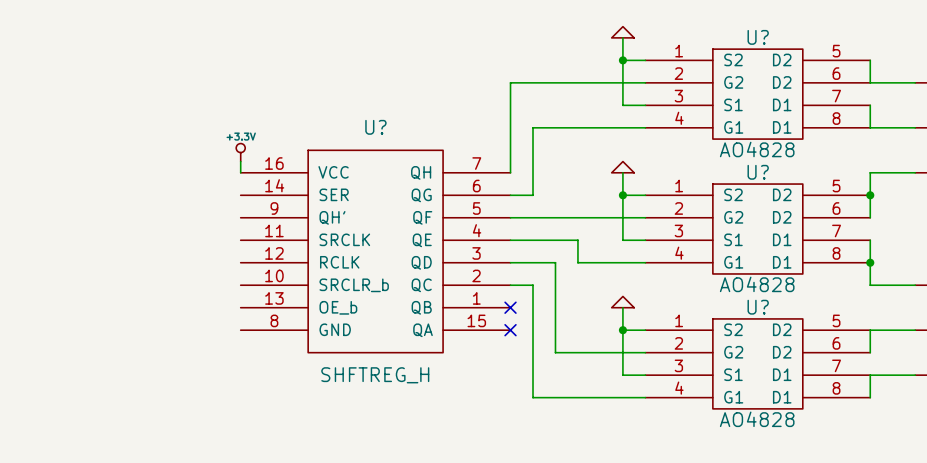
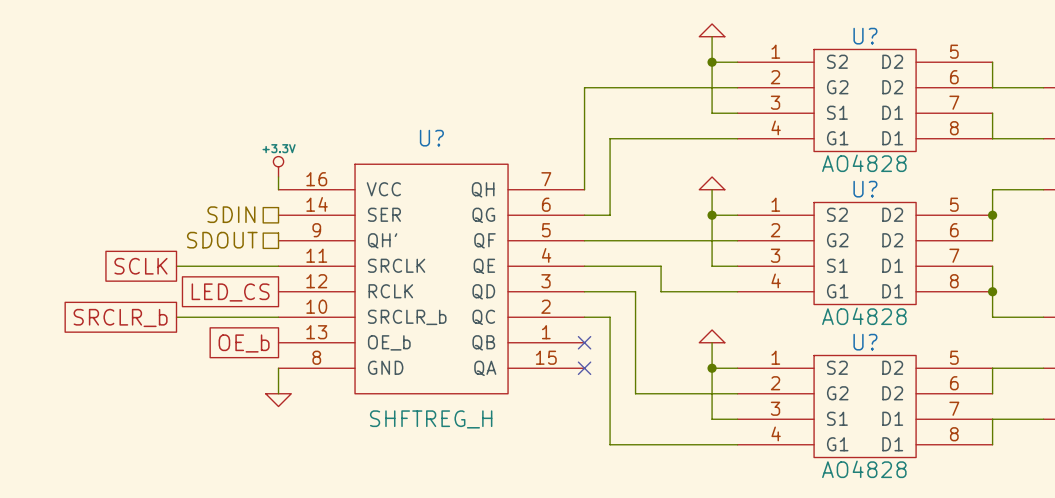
hierarchical label: none -> SDIN (231, 214)
hierarchical label: none -> SDOUT (222, 240)
global label: none -> SCLK (140, 266)
wire: none -> (176, 266) (278, 266)
global label: none -> LED_CS (230, 292)
global label: none -> SRCLR_b (120, 317)
wire: none -> (176, 317) (278, 317)
global label: none -> OE_b (244, 343)
wire: none -> (278, 368) (278, 393)
power symbol: none -> (278, 400)

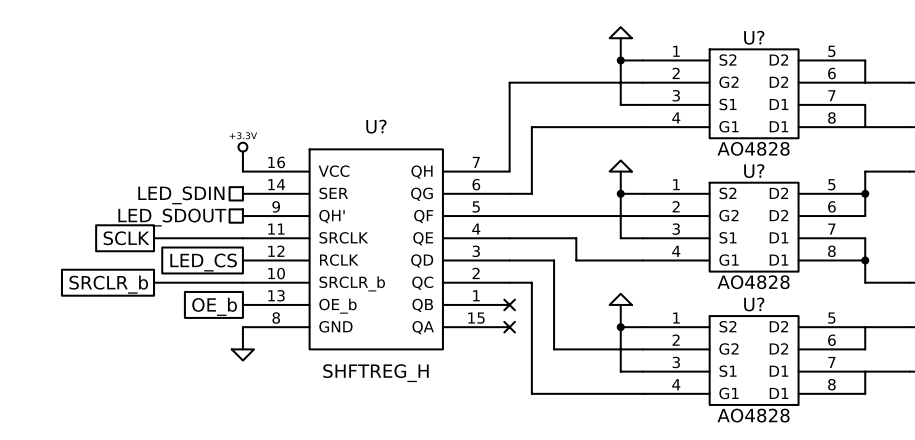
hierarchical label: SDIN (231, 214) -> LED_SDIN (181, 195)
hierarchical label: SDOUT (222, 240) -> LED_SDOUT (172, 217)

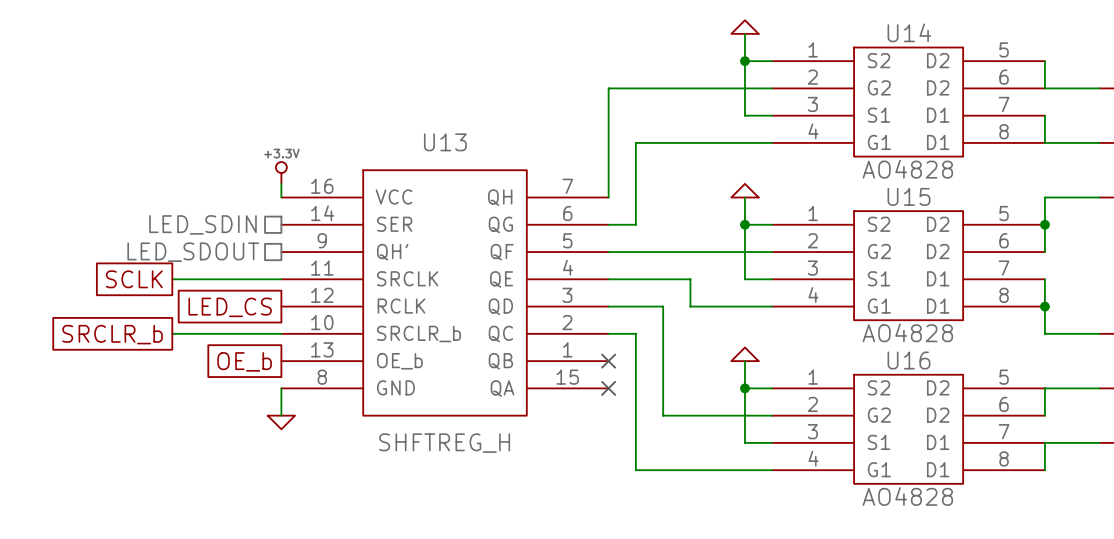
U? name: U? (754, 37) -> U14 (909, 32)
U? name: U? (376, 126) -> U13 (445, 142)
U? name: U? (754, 171) -> U15 (908, 196)
U? name: U? (754, 304) -> U16 (908, 360)

